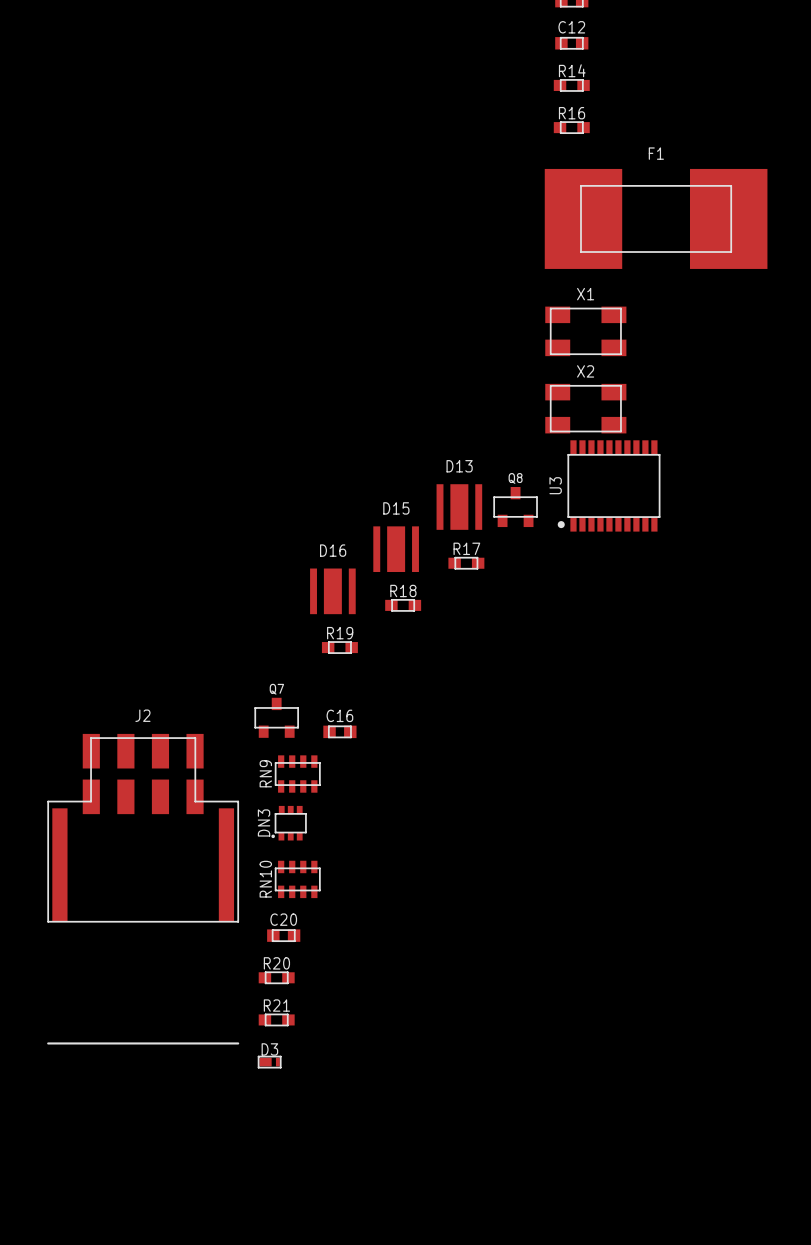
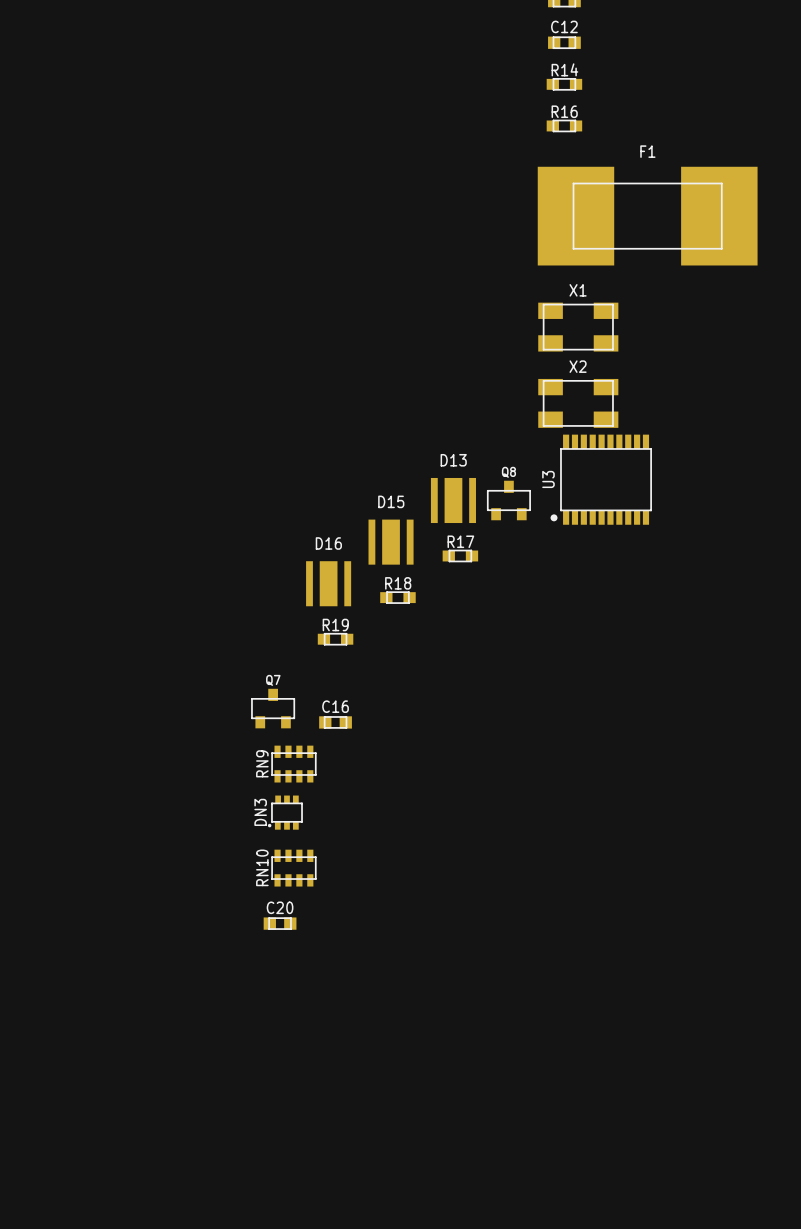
J2: (143, 889) -> none
R20: (276, 977) -> none
R21: (276, 1019) -> none
D3: (269, 1062) -> none

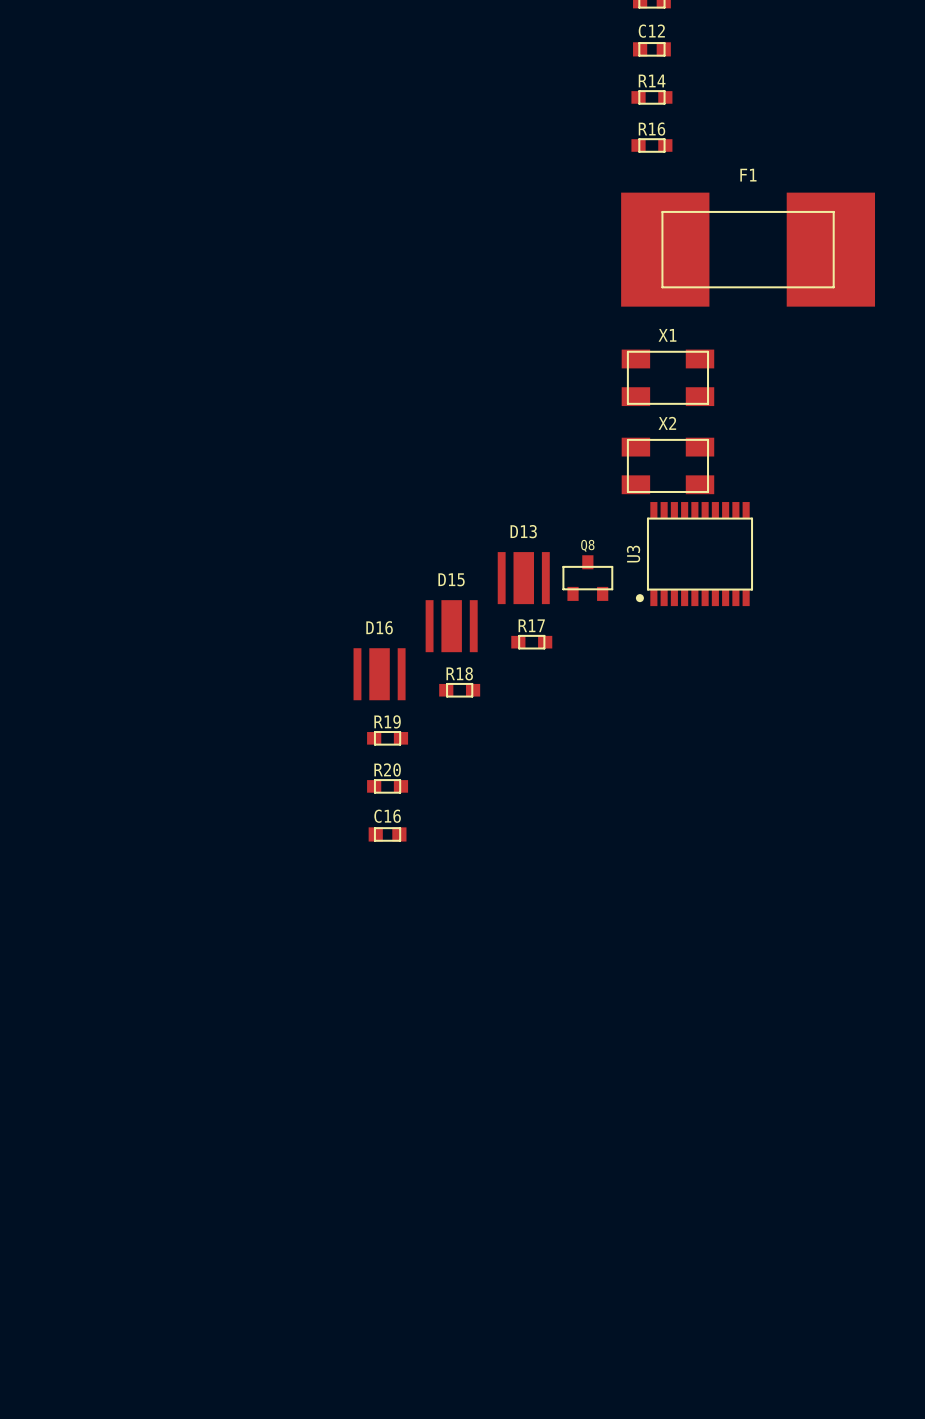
R20: none -> (387, 786)
Q7: (273, 708) -> none
RN9: (293, 764) -> none
DN3: (285, 812) -> none
RN10: (293, 868) -> none
C20: (280, 923) -> none

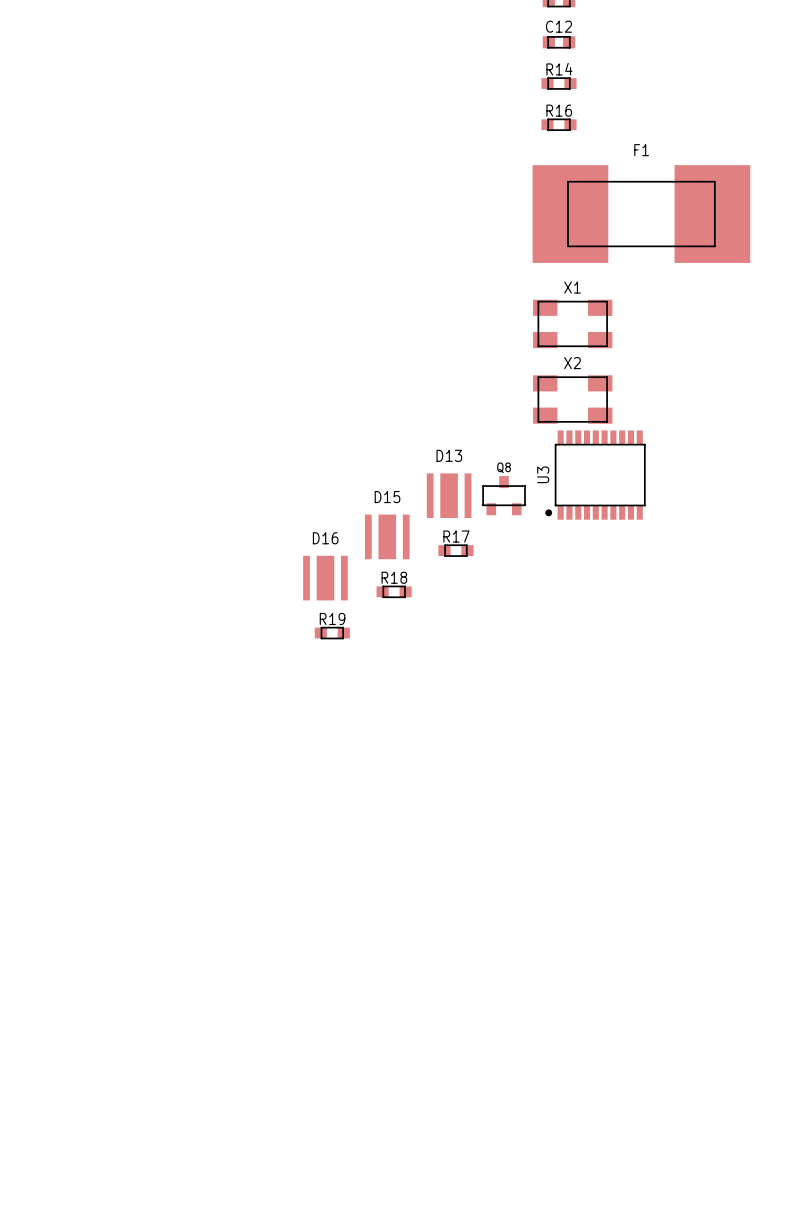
R20: (387, 786) -> none
C16: (387, 834) -> none

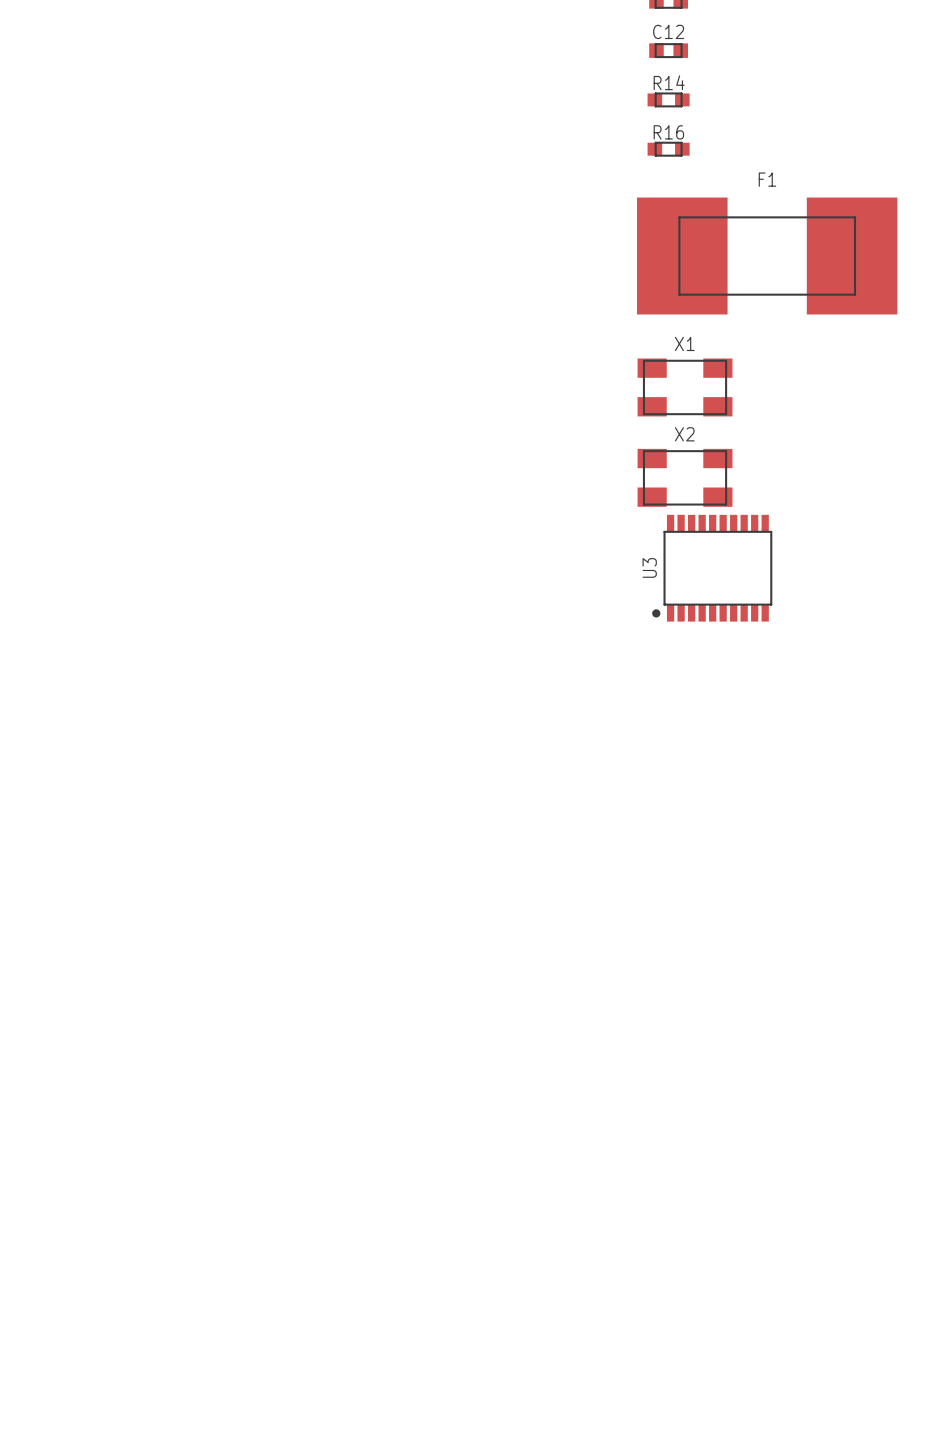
D13: (449, 495) -> none
Q8: (504, 495) -> none
D15: (387, 536) -> none
R17: (455, 550) -> none
D16: (325, 578) -> none
R18: (394, 591) -> none
R19: (332, 633) -> none

